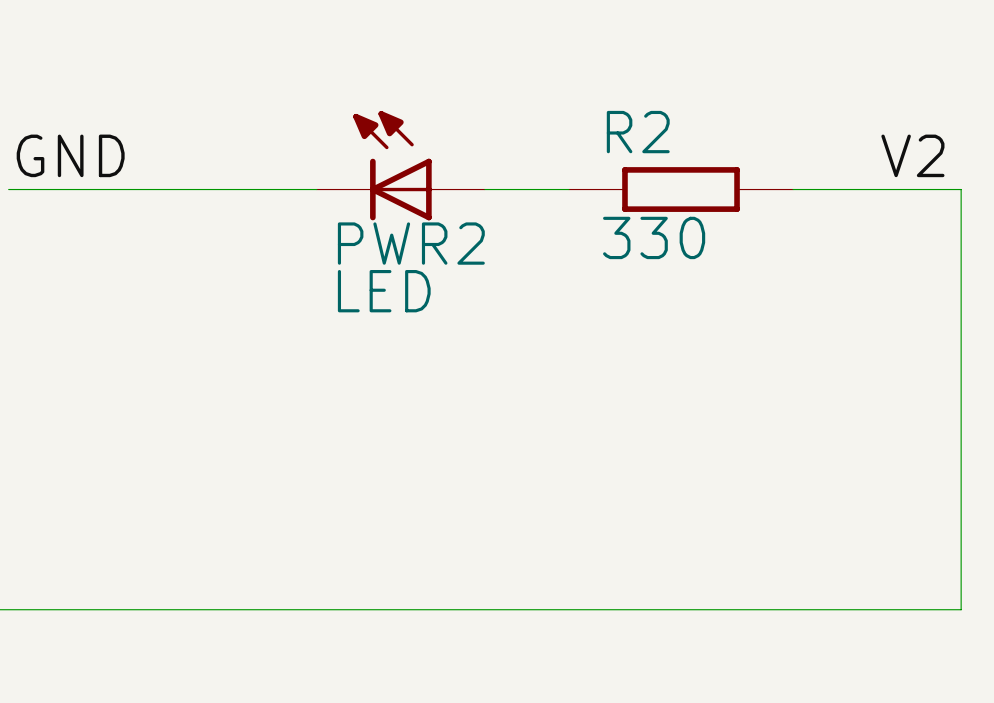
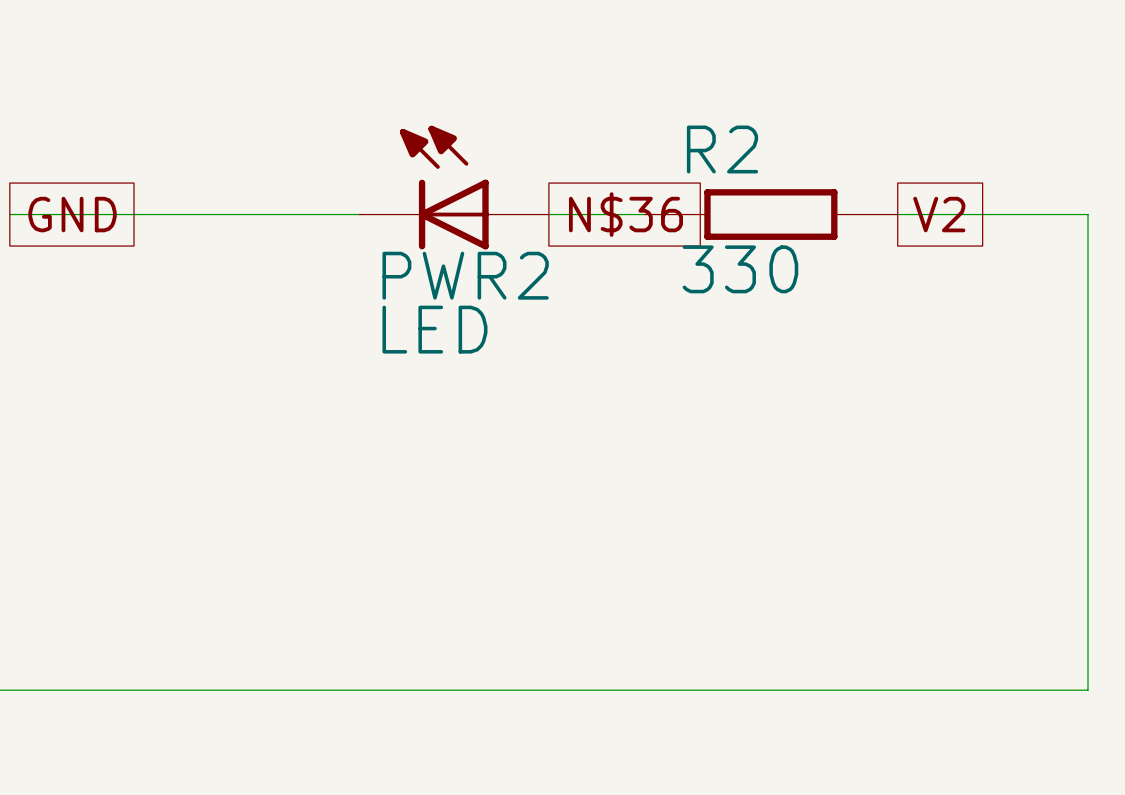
label: GND (70, 155) -> none
label: V2 (912, 155) -> none
global label: none -> GND (72, 214)
global label: none -> N$36 (625, 214)
global label: none -> V2 (939, 214)

